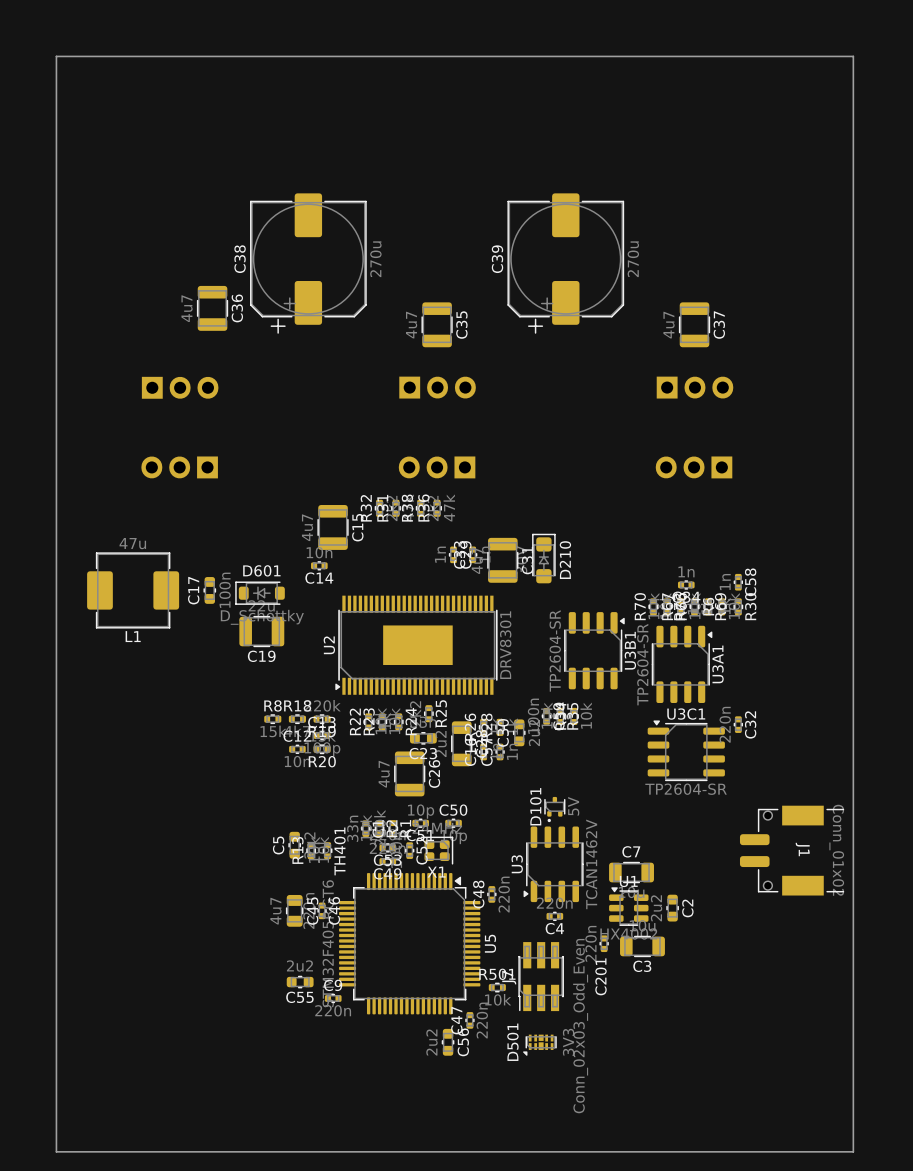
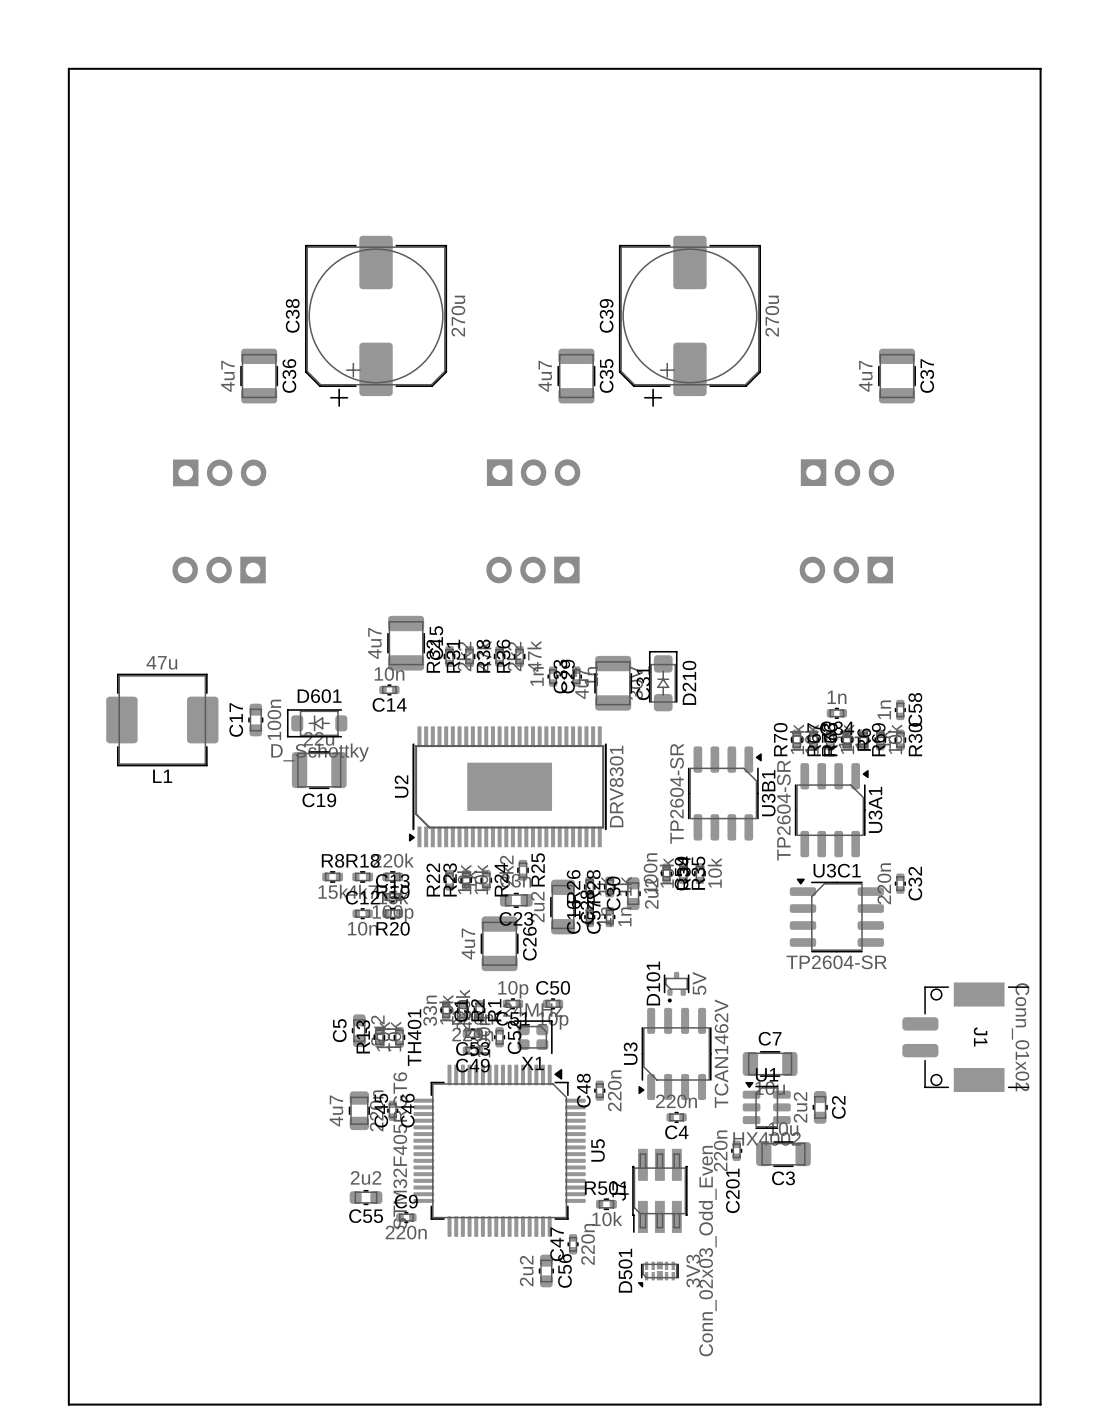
C35 position: (437, 324) -> (576, 376)
C37 position: (694, 324) -> (897, 376)
R32 position: (379, 508) -> (449, 656)
R31 position: (396, 508) -> (469, 656)
R38 position: (420, 508) -> (499, 656)
R36 position: (437, 508) -> (519, 656)

